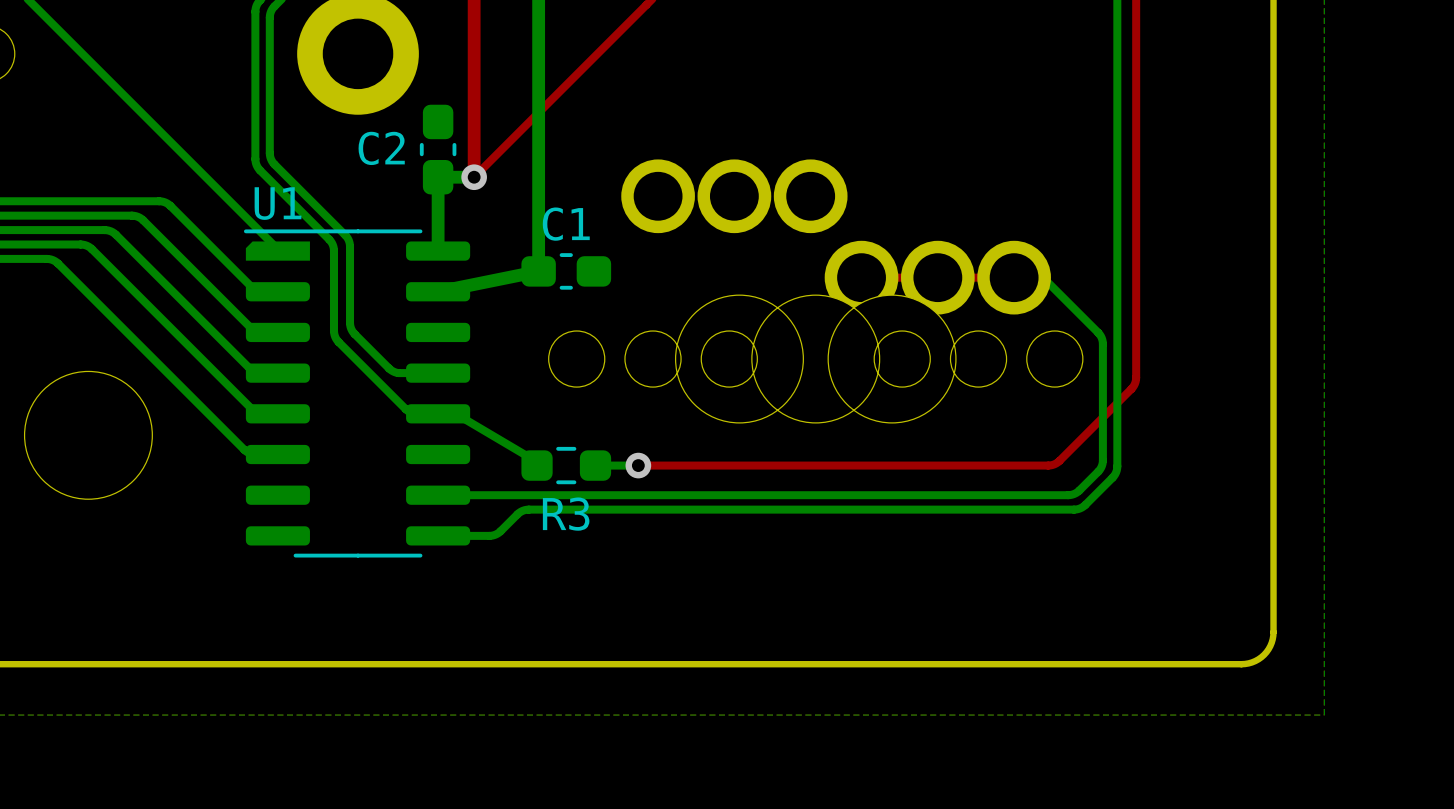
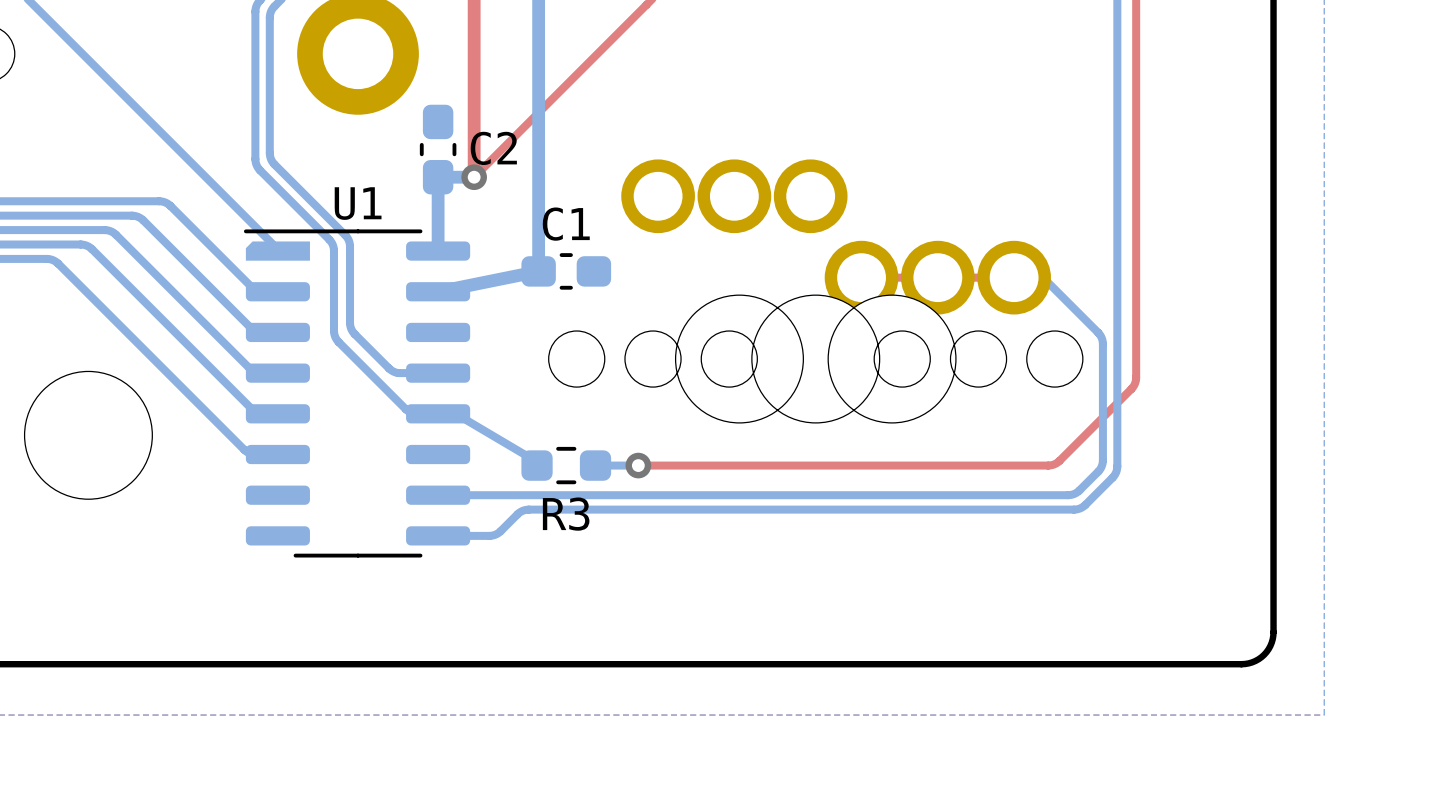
C2 name position: C2 (381, 148) -> C2 (493, 148)
U1 name position: U1 (278, 203) -> U1 (358, 203)

